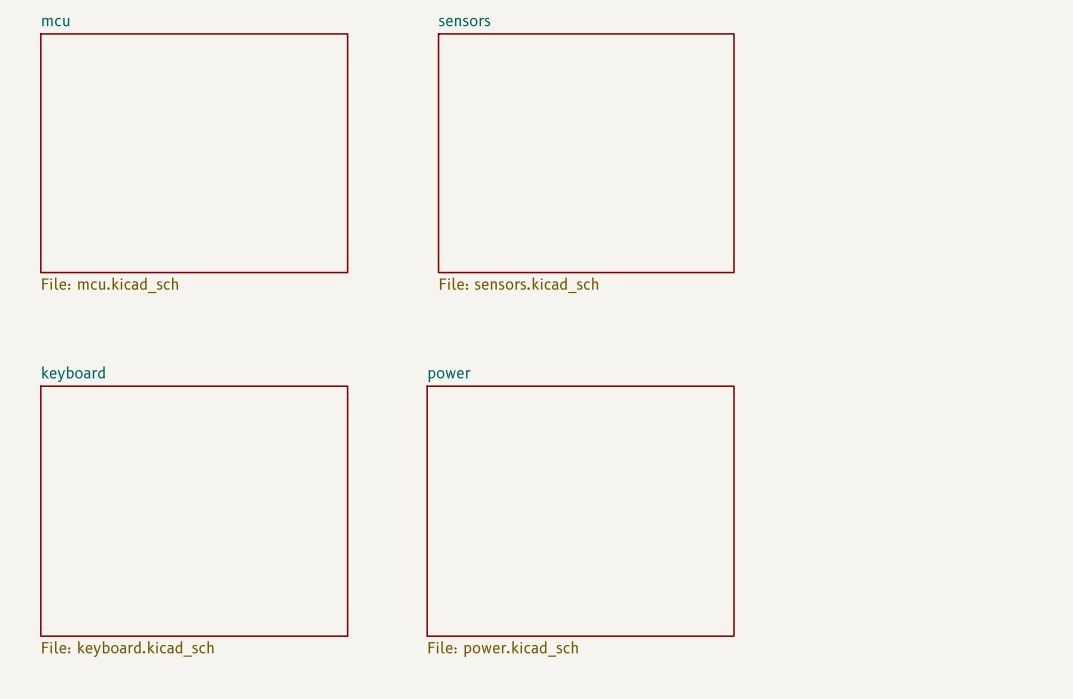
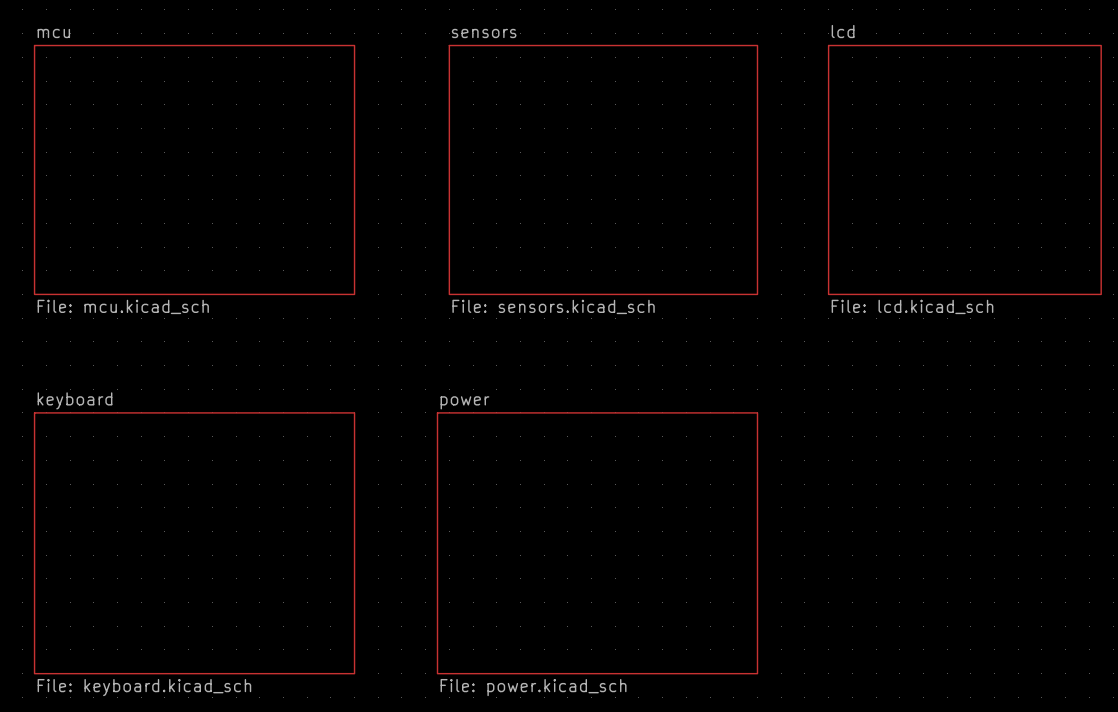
sheet lcd: none -> File: lcd.kicad_sch (964, 169)

